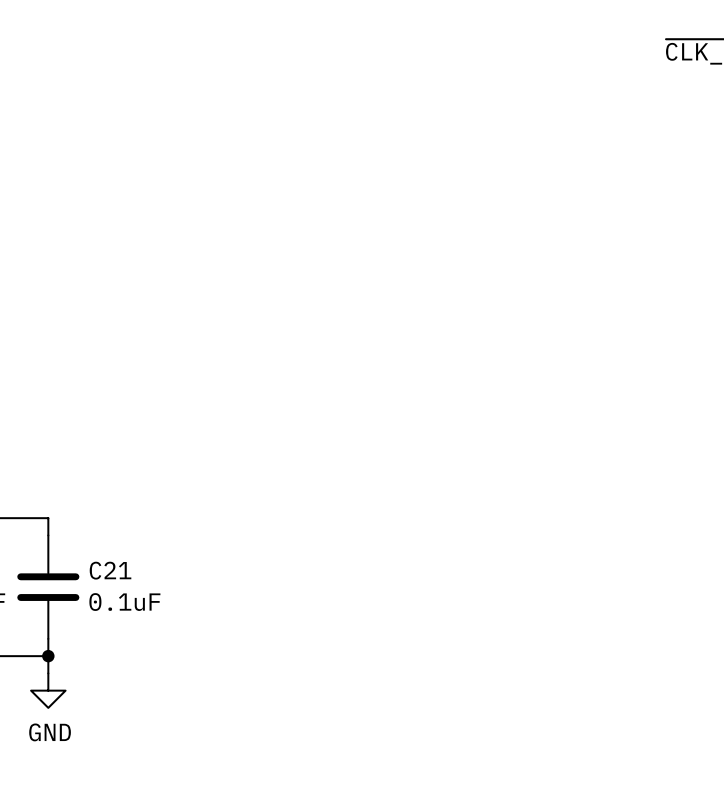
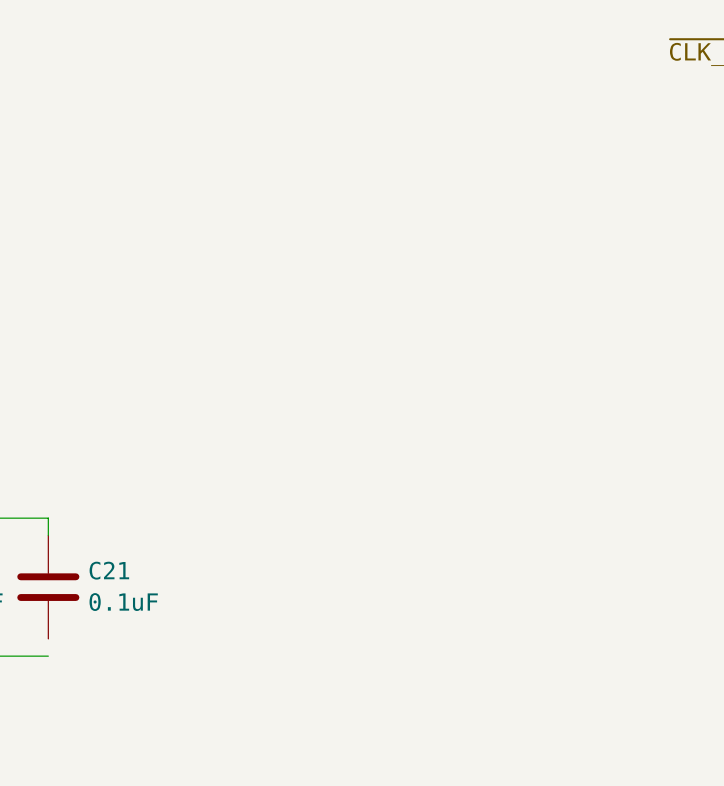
wire: (48, 638) (48, 673) -> none
junction: (48, 656) -> none
power symbol: GND (48, 690) -> none

